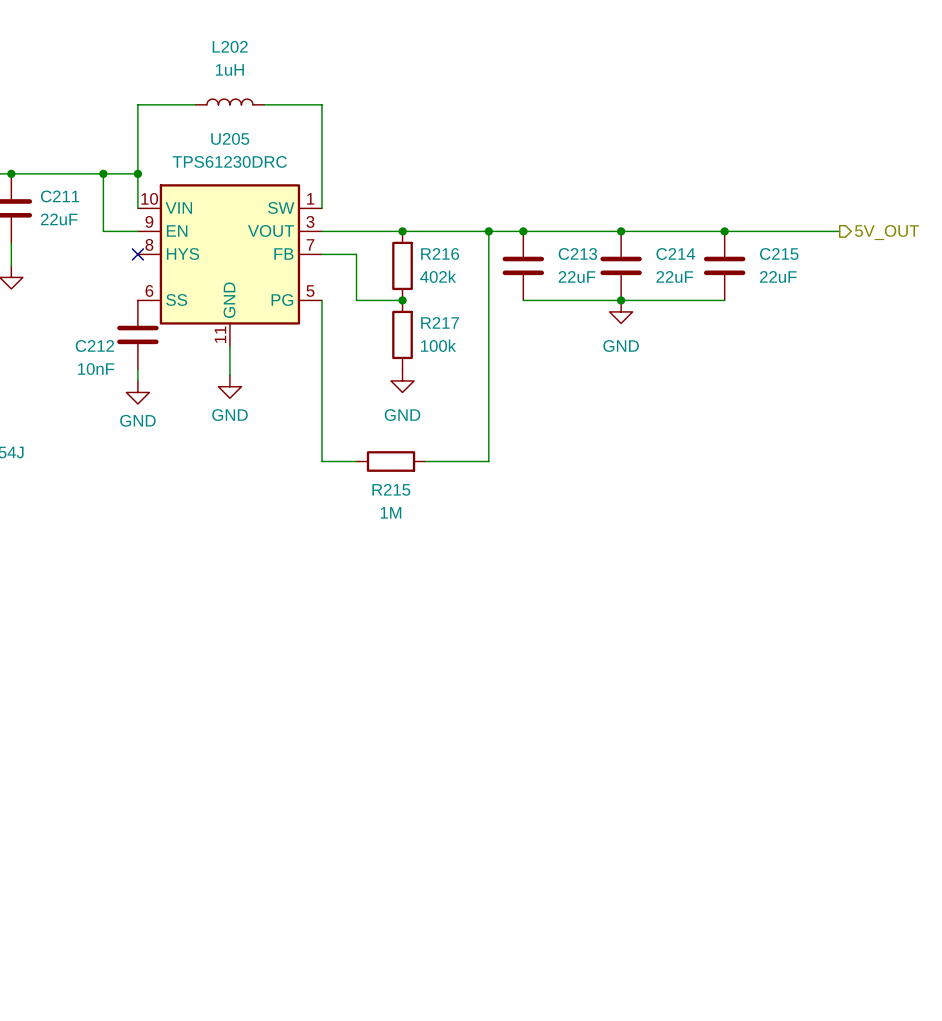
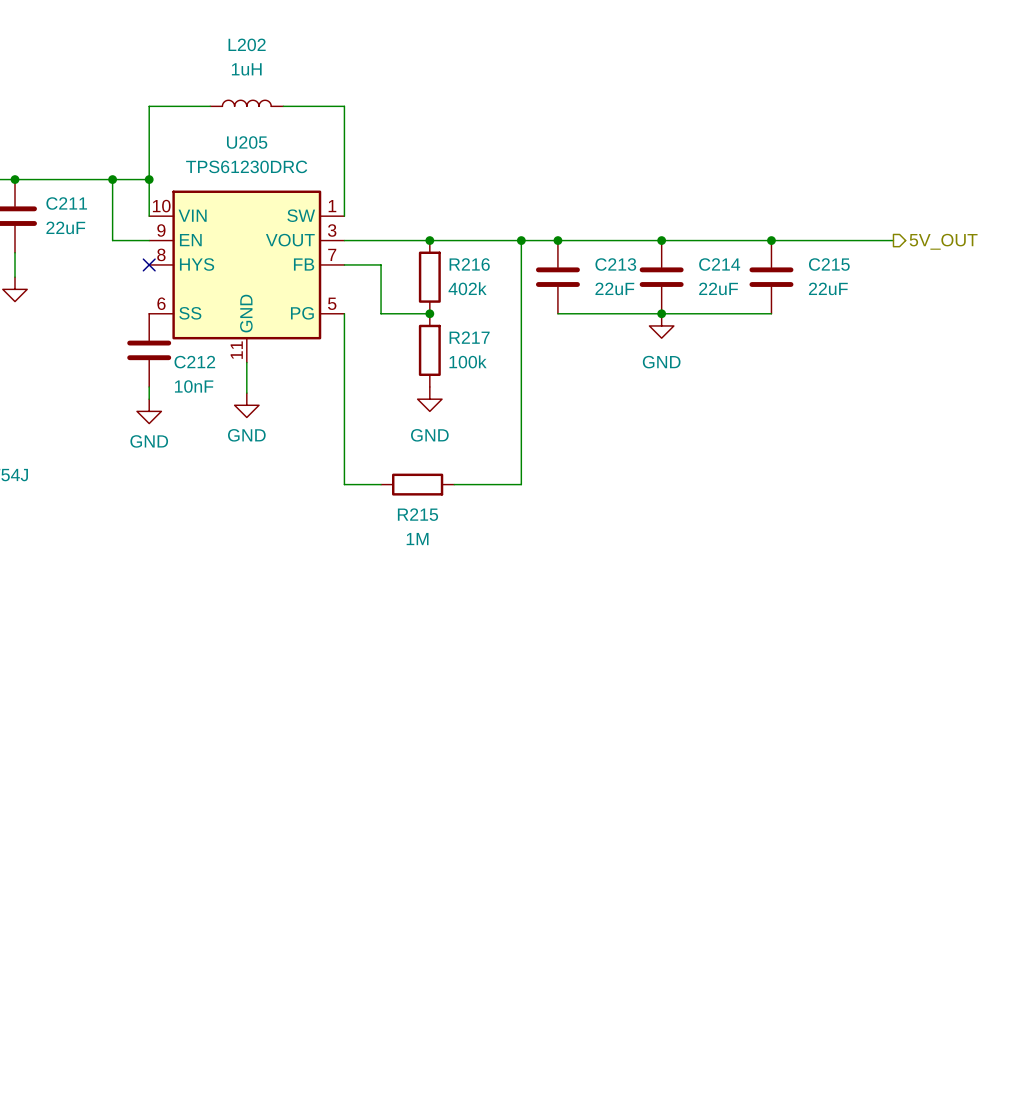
C212 name position: C212 (94, 346) -> C212 (194, 362)
C212 value position: 10nF (96, 369) -> 10nF (194, 386)

